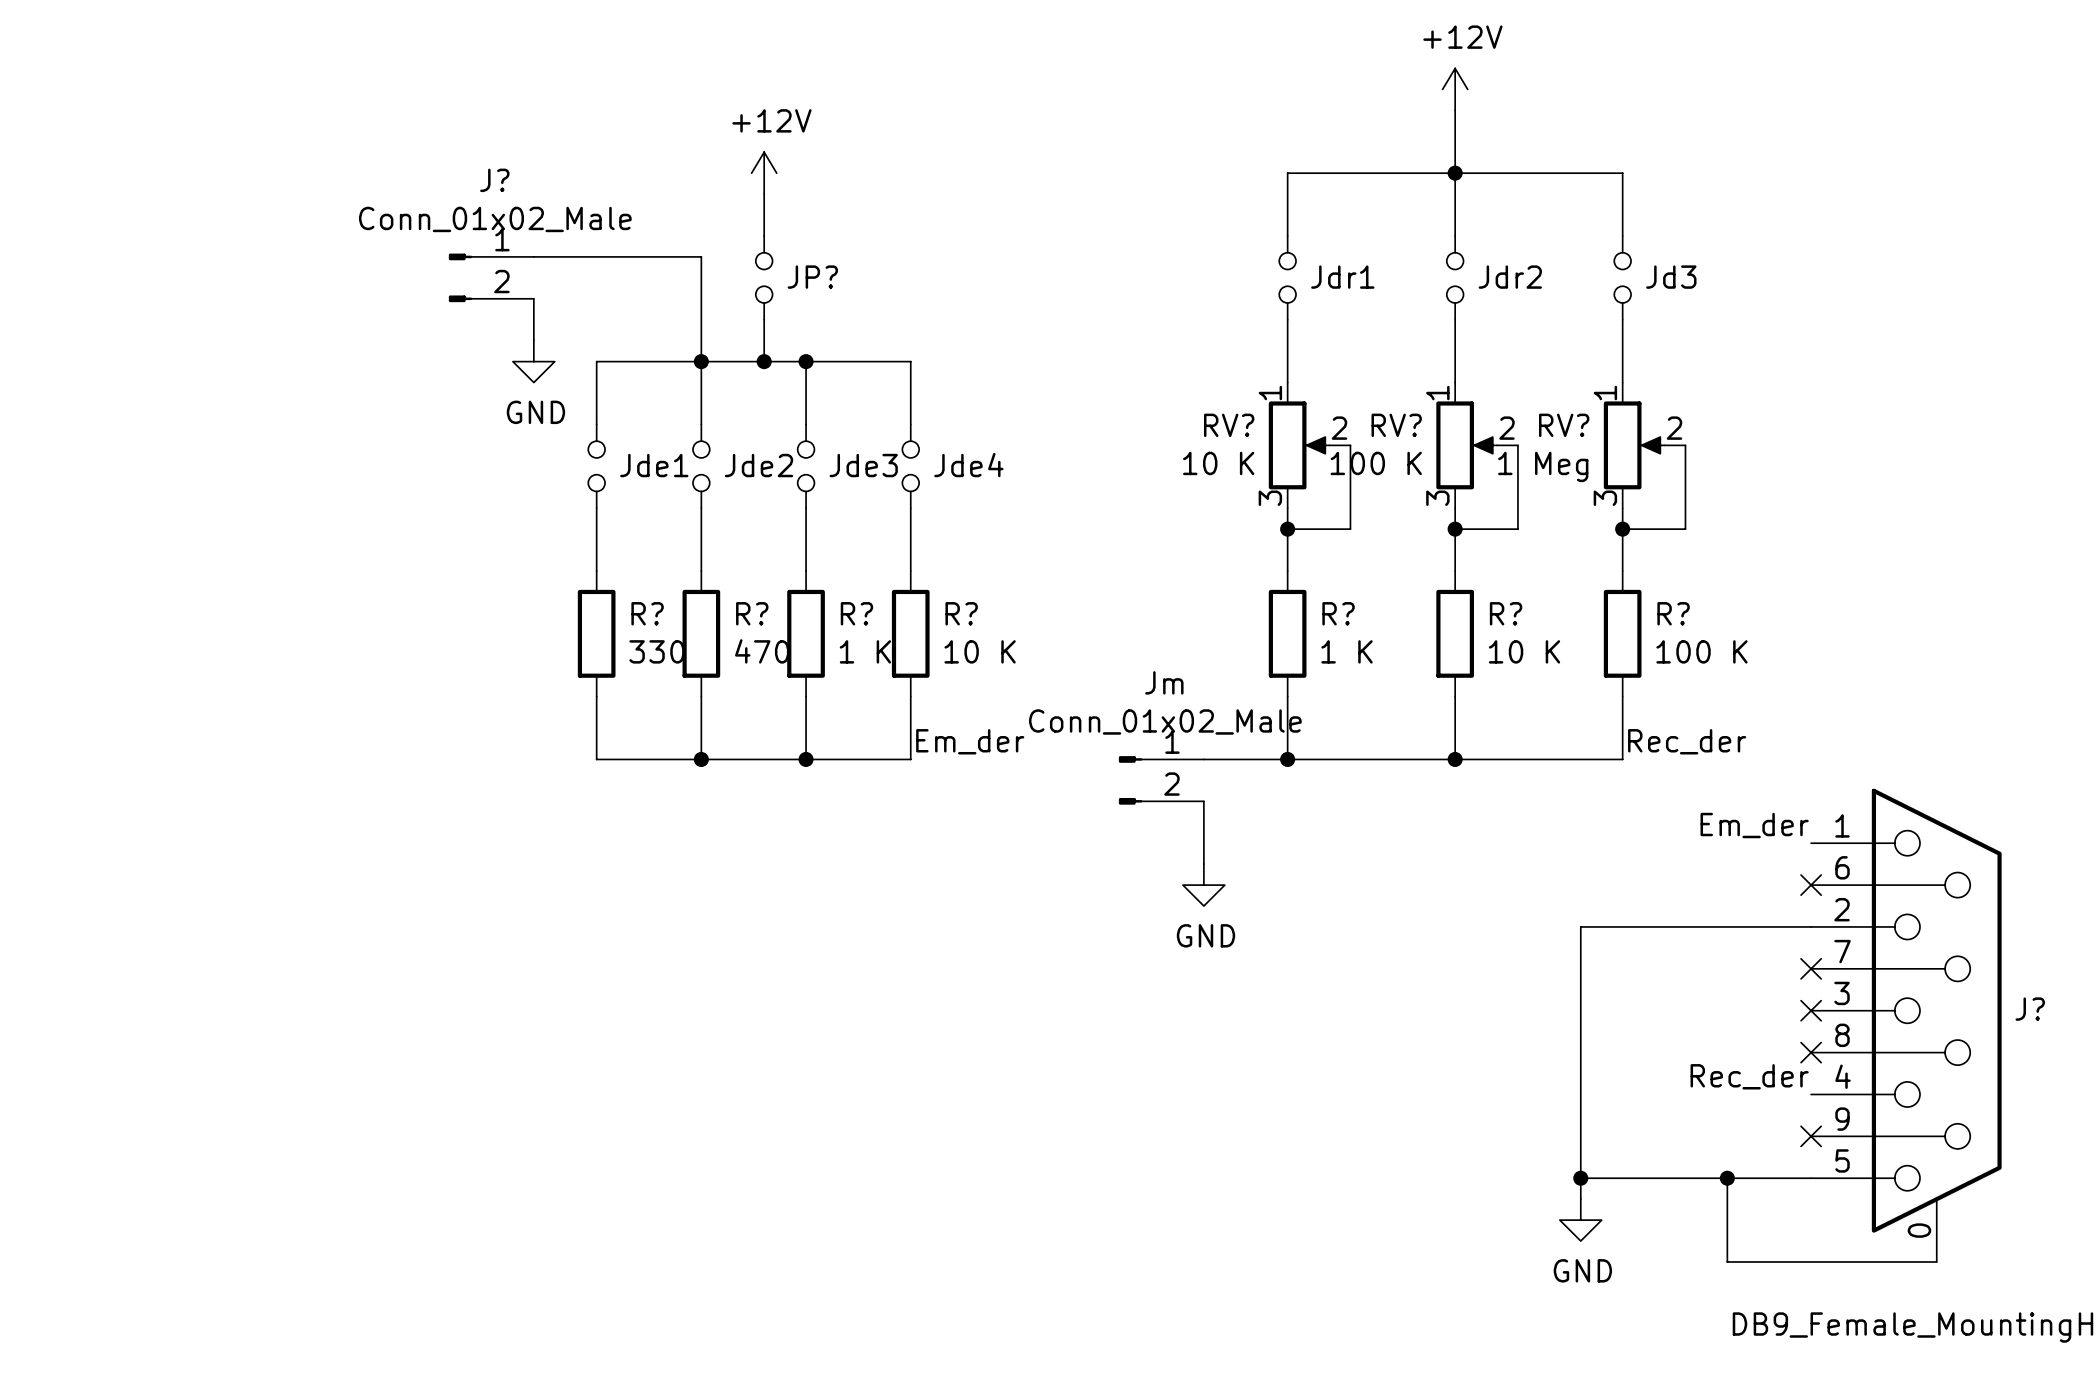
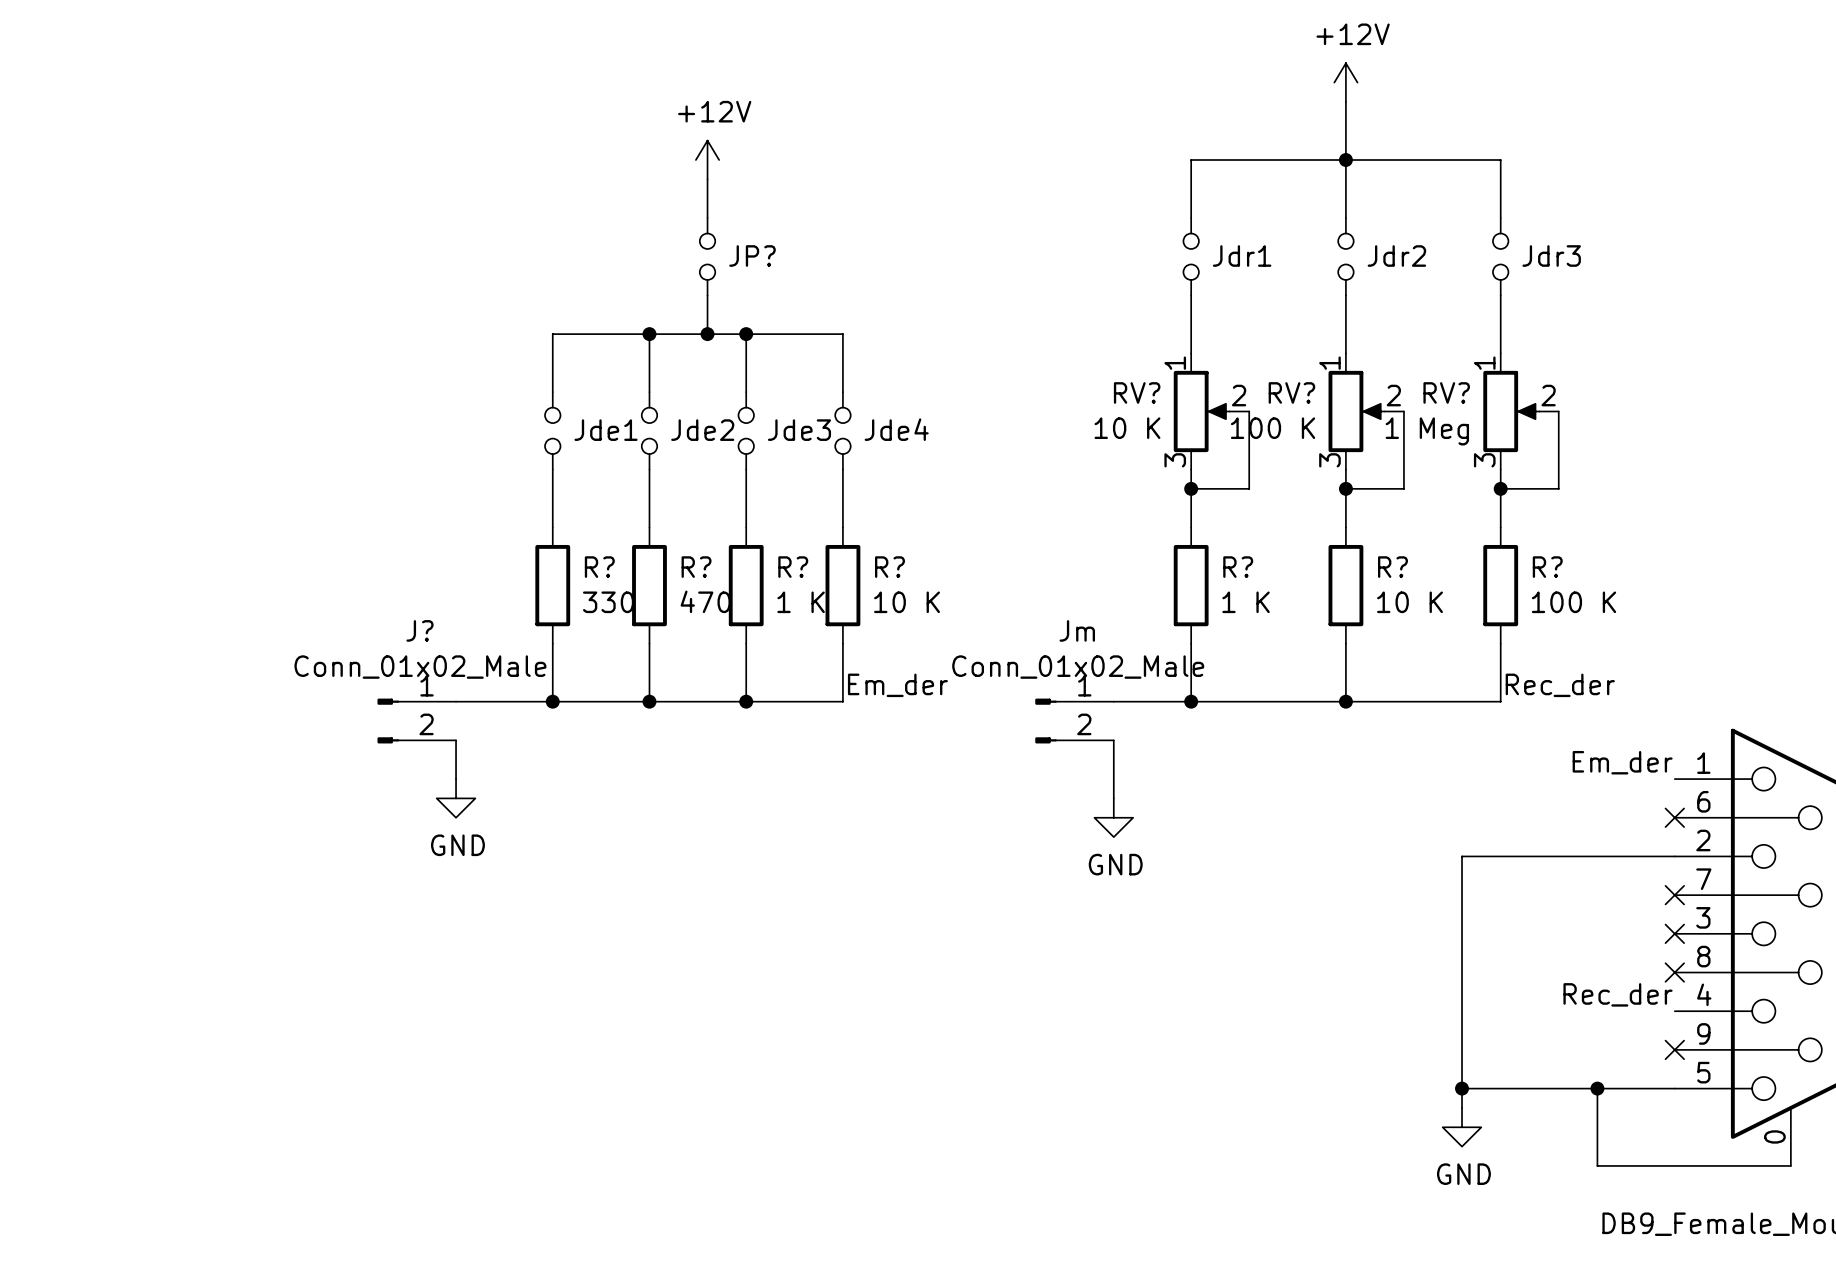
wire: (533, 256) (701, 256) (701, 361) -> none
J?: Conn_01x02_Male (491, 277) -> none
Jd3 name: Jd3 (1671, 277) -> Jdr3 (1551, 256)
wire: (533, 298) (533, 340) -> none
power symbol: GND (533, 361) -> none
wire: none -> (456, 701) (552, 701)
junction: none -> (552, 701)
J?: none -> Conn_01x02_Male (416, 721)
wire: none -> (456, 740) (456, 779)
power symbol: none -> GND (456, 798)

